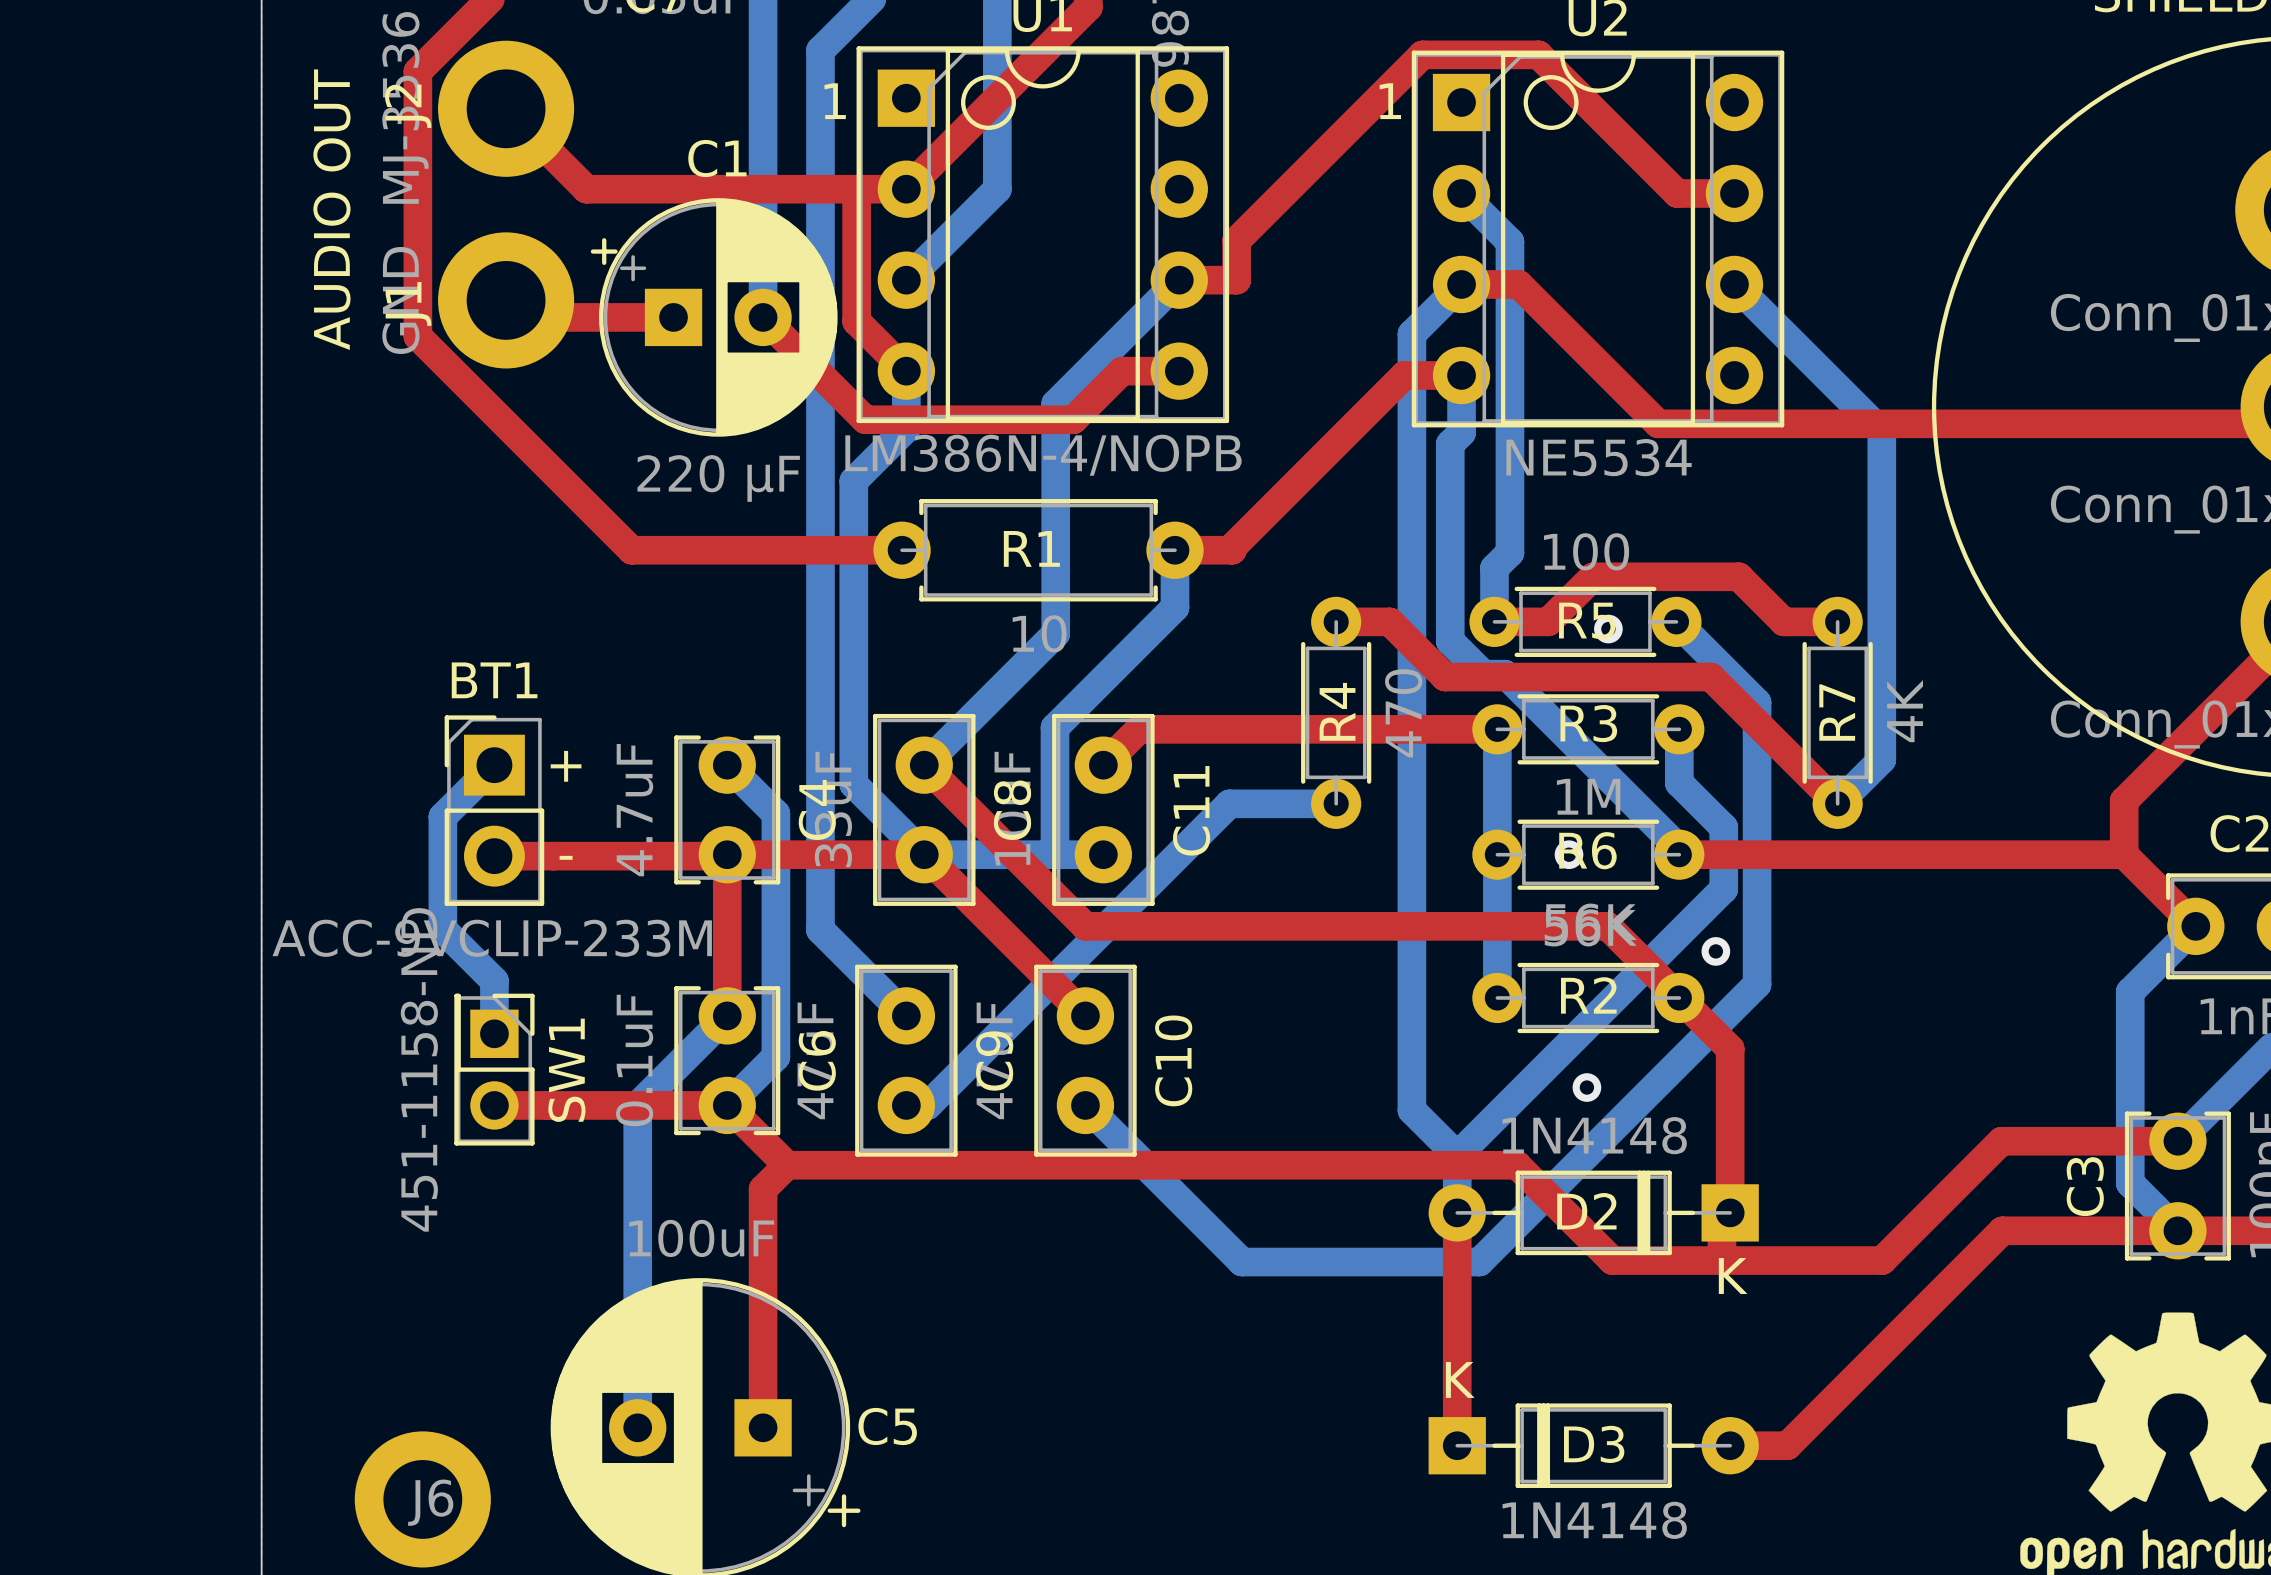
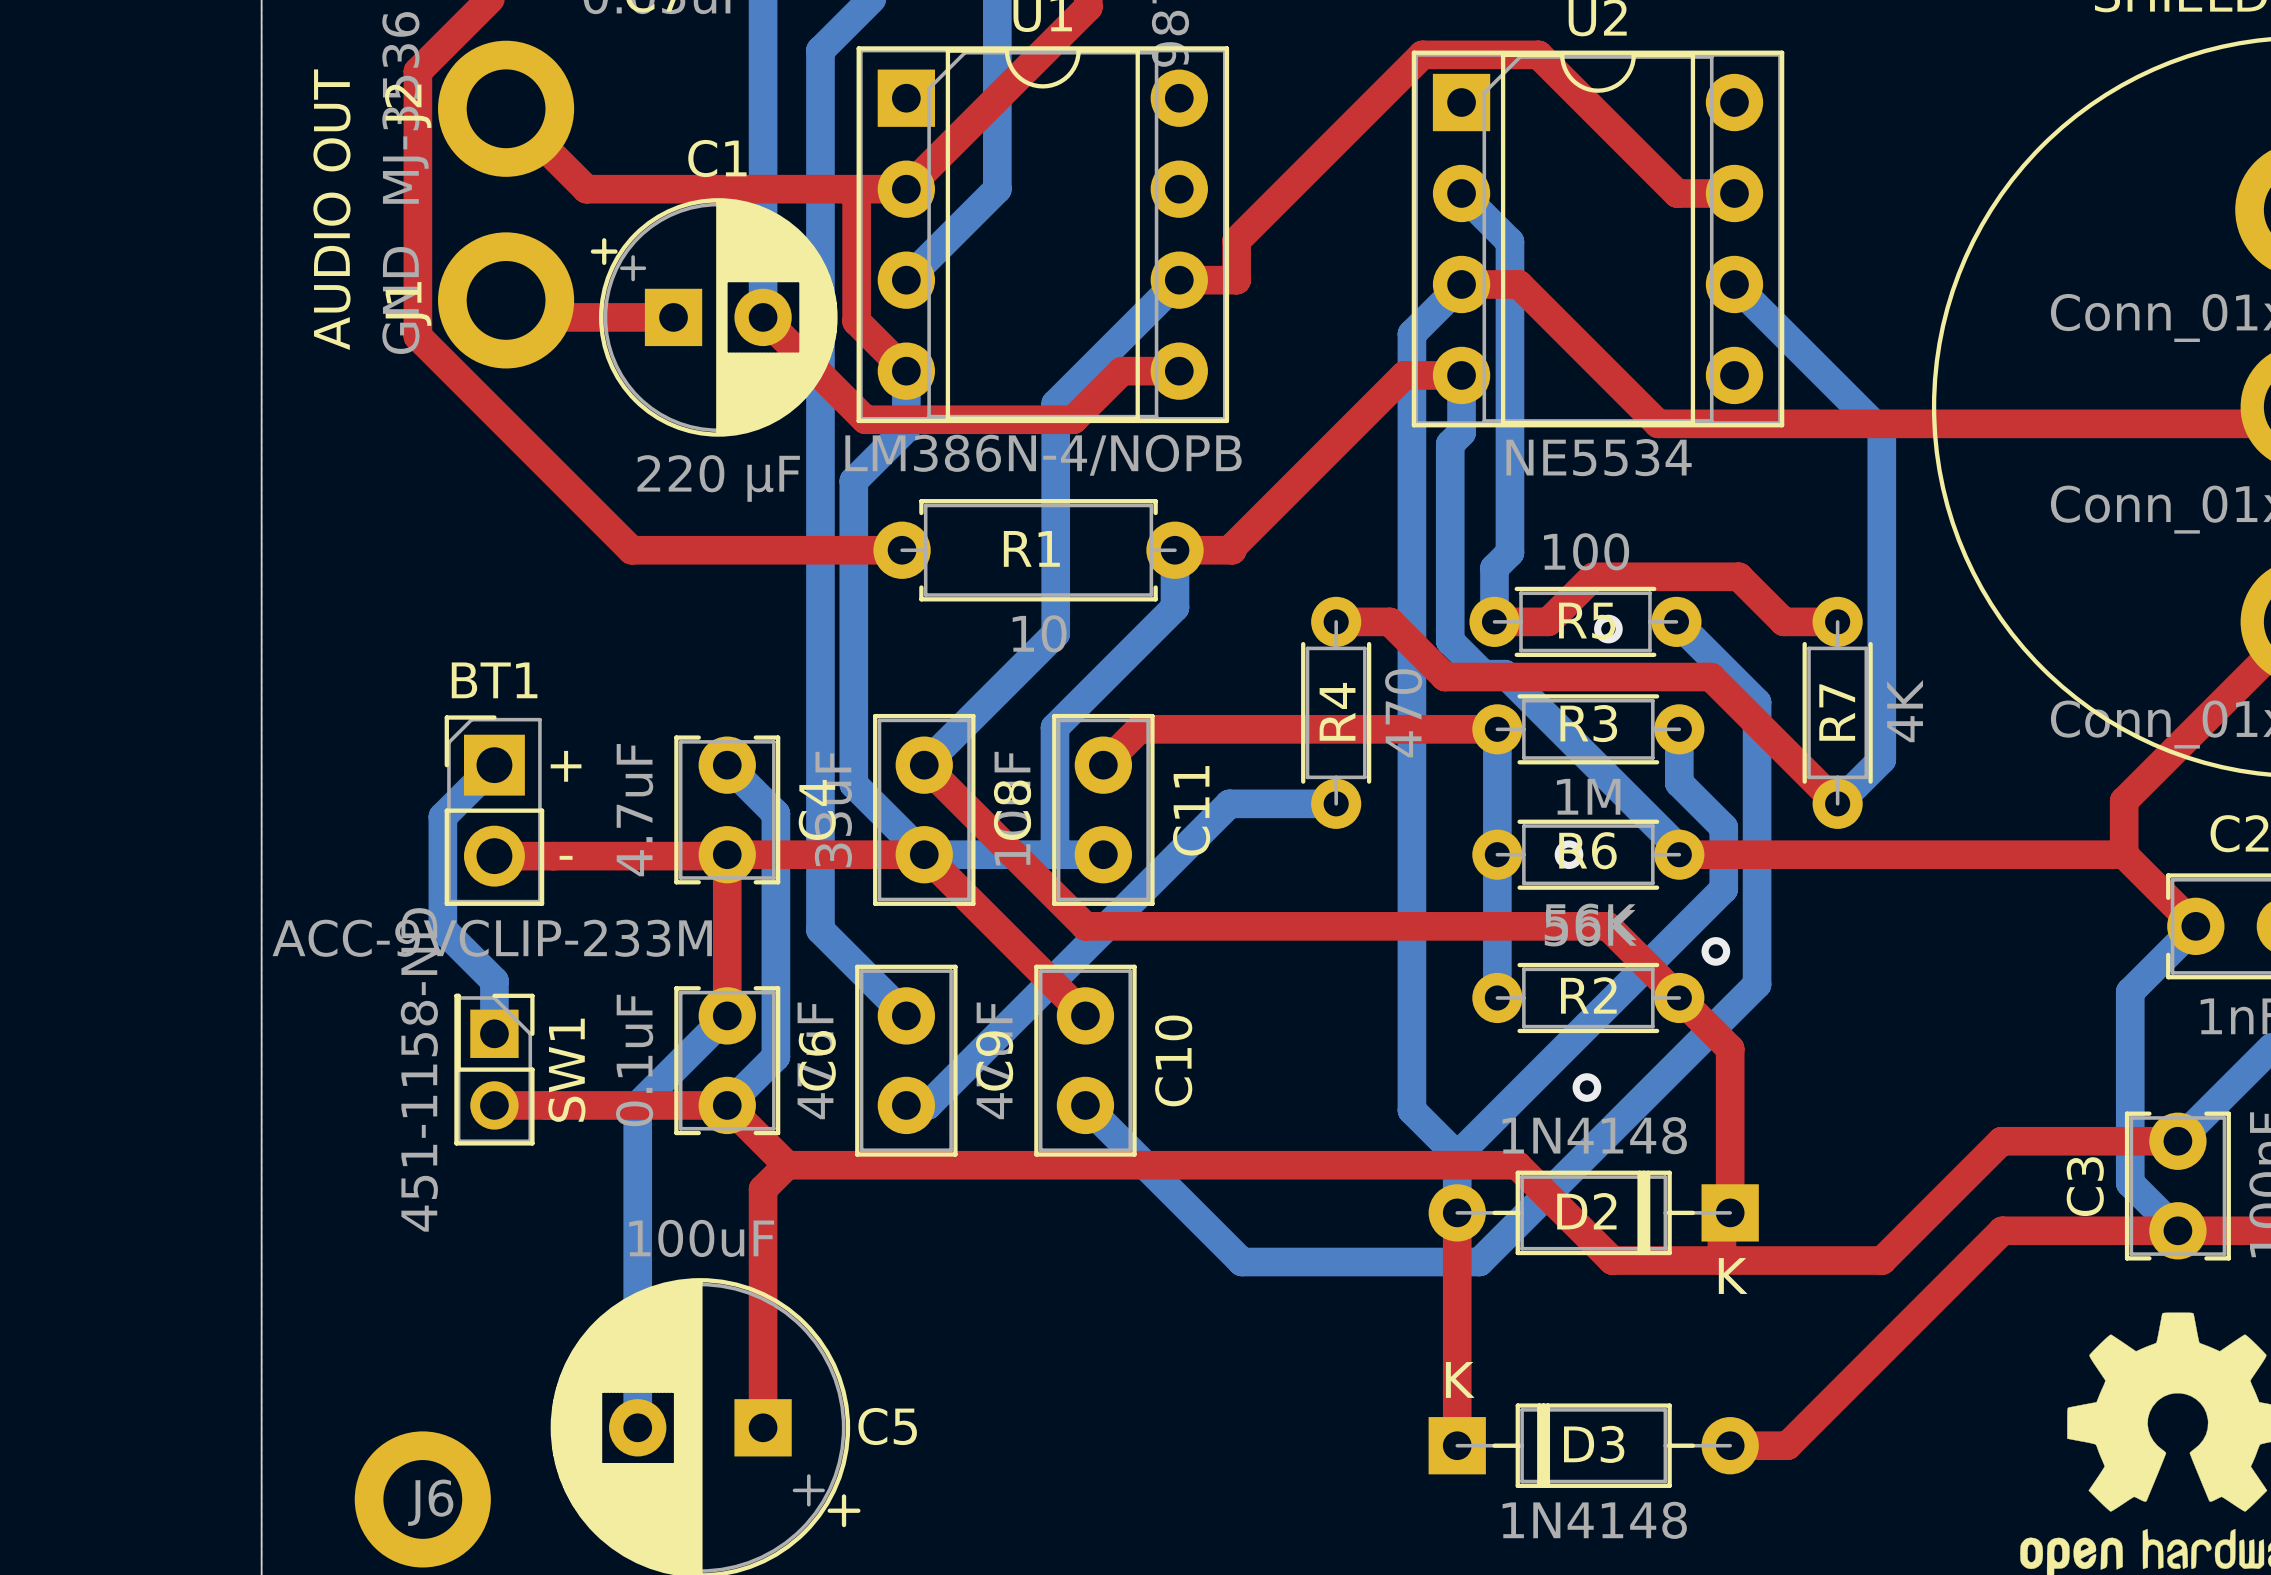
drawing: [961, 75, 1016, 130] -> none
drawing: [1523, 75, 1579, 130] -> none
text: 1 (835, 101) -> none
text: 1 (1390, 101) -> none

